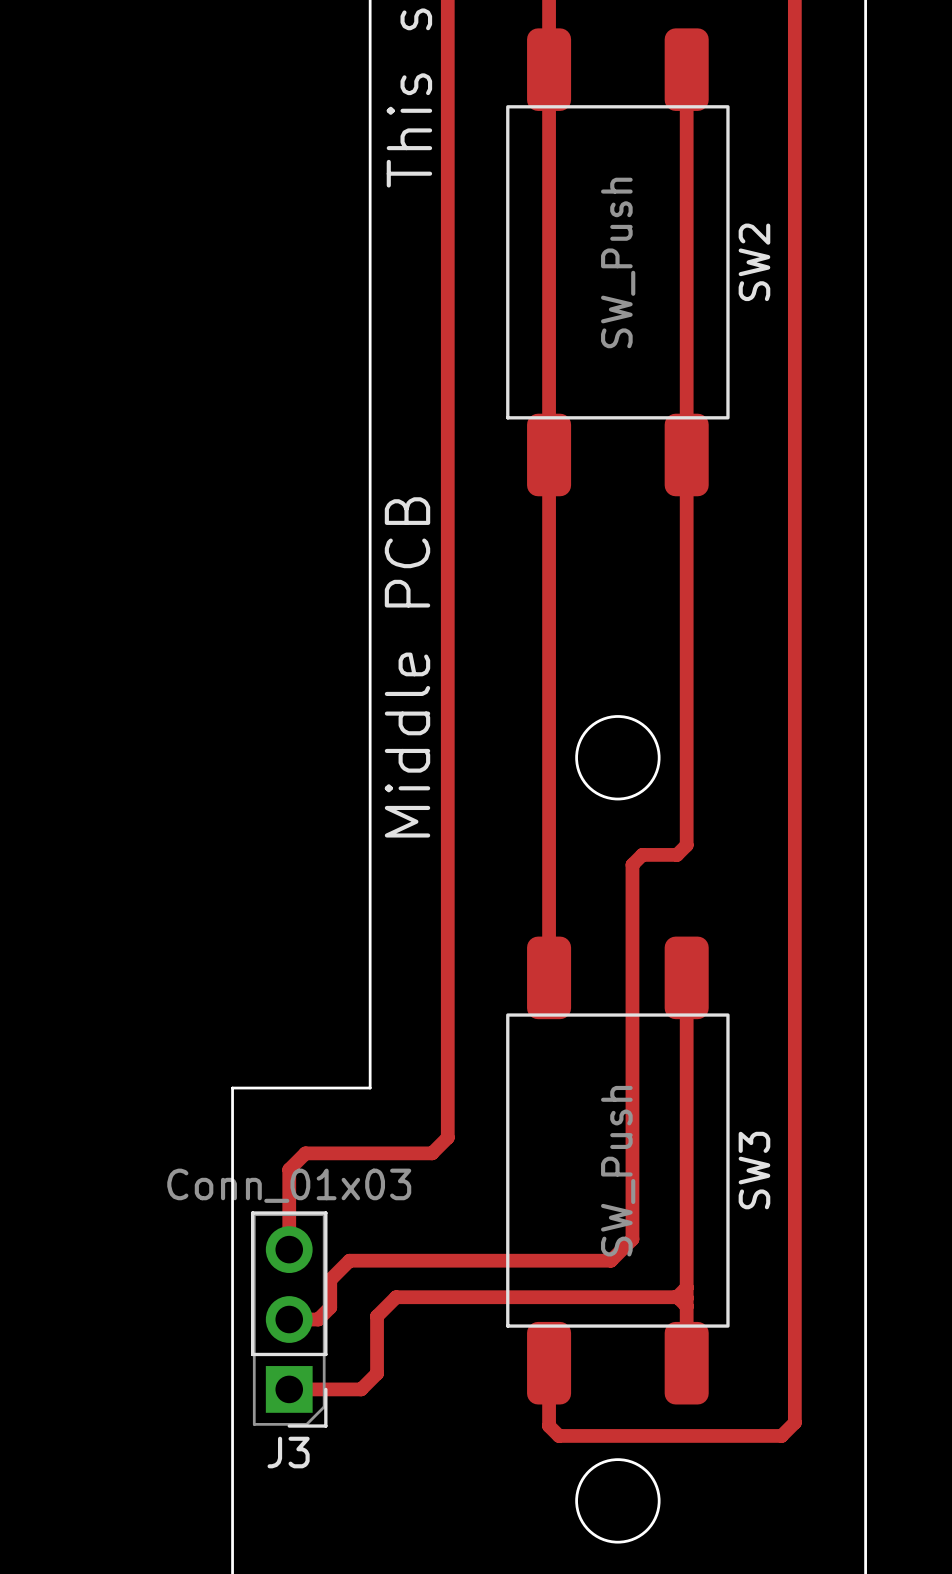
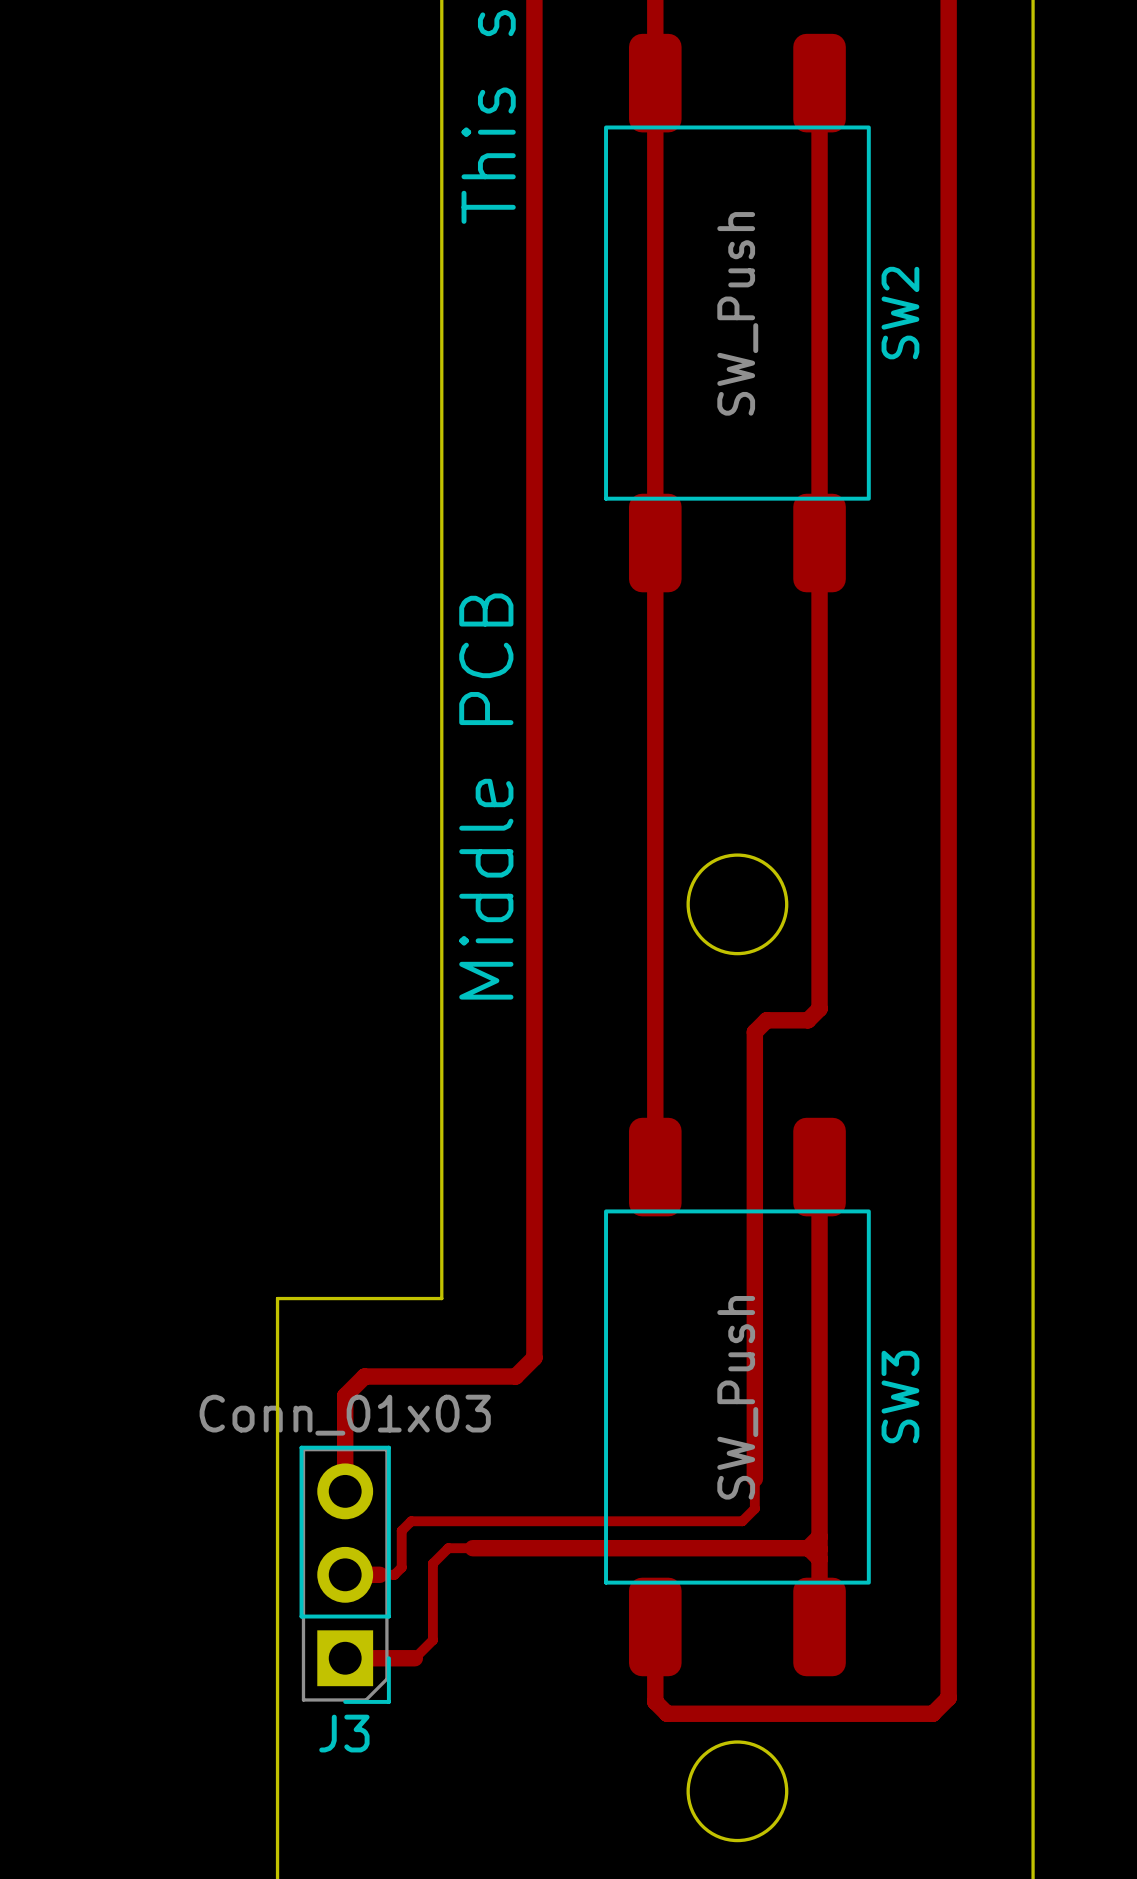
track: (632, 1239) (611, 1260) (349, 1260) (330, 1279) (330, 1307) (318, 1319) -> (754, 1479) (754, 1508) (742, 1521) (411, 1521) (401, 1530) (401, 1567) (394, 1574) (379, 1574)
track: (396, 1297) (377, 1316) (377, 1373) (361, 1389) (347, 1389) -> (472, 1548) (448, 1548) (432, 1563) (432, 1640) (414, 1658)

